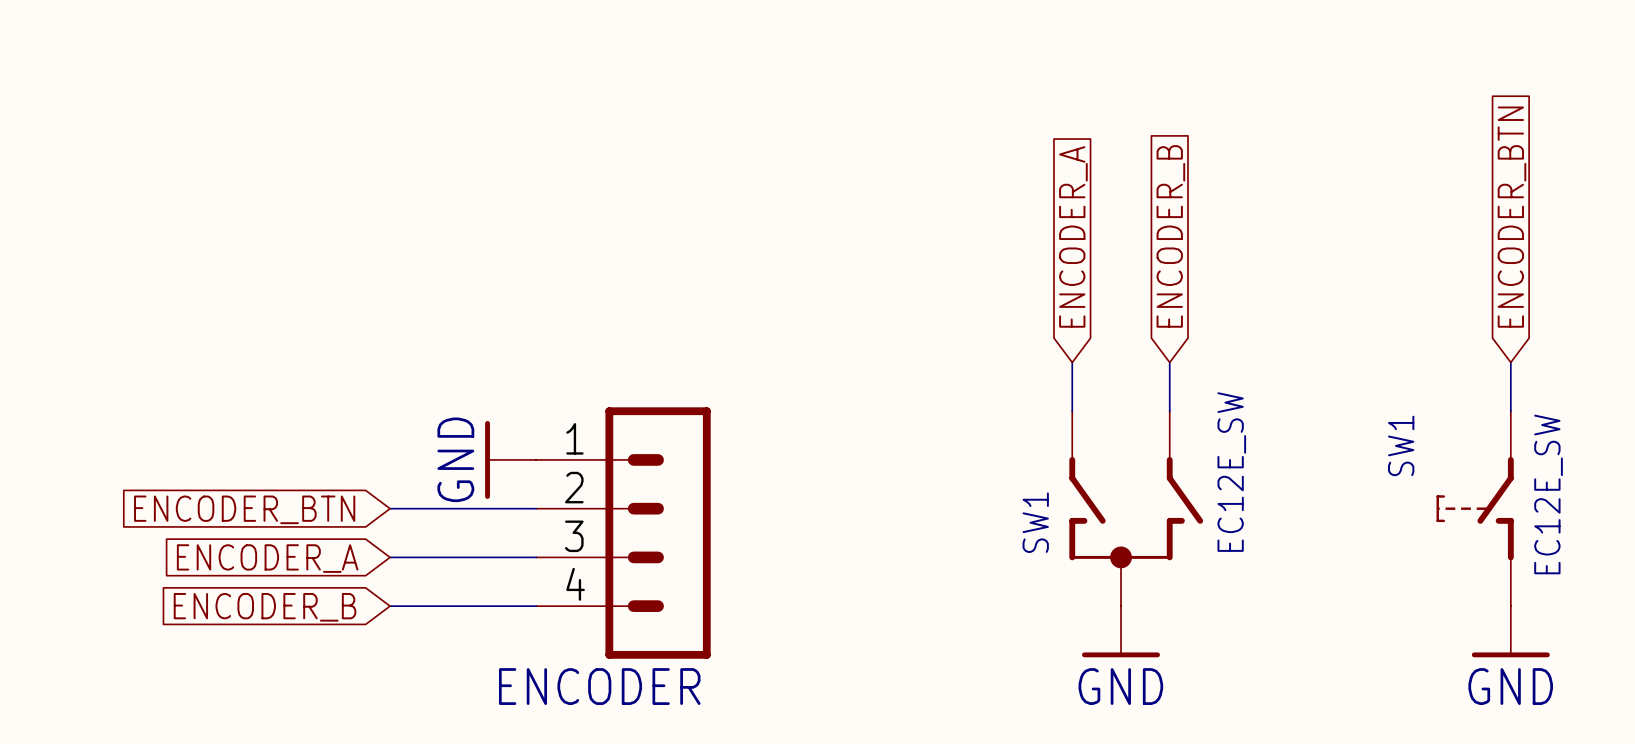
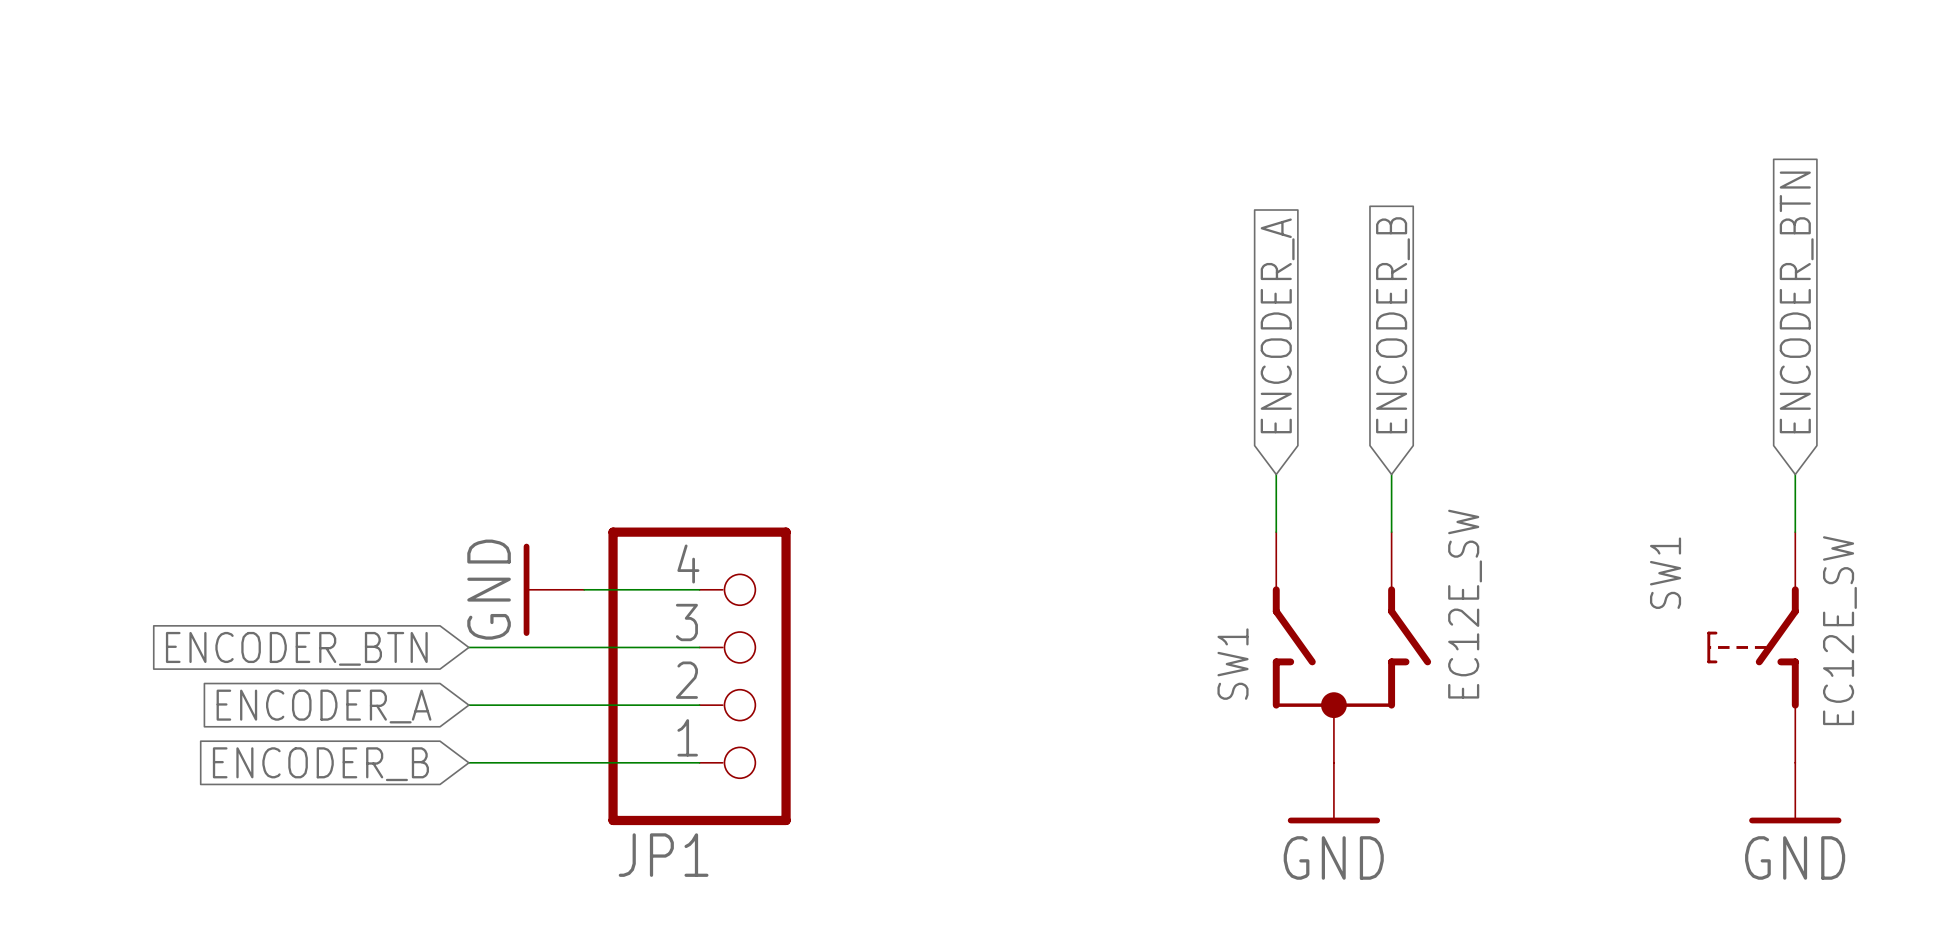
power symbol position: GND (510, 459) -> GND (553, 589)
JP1: none -> (699, 676)
ENCODER: (623, 533) -> none

